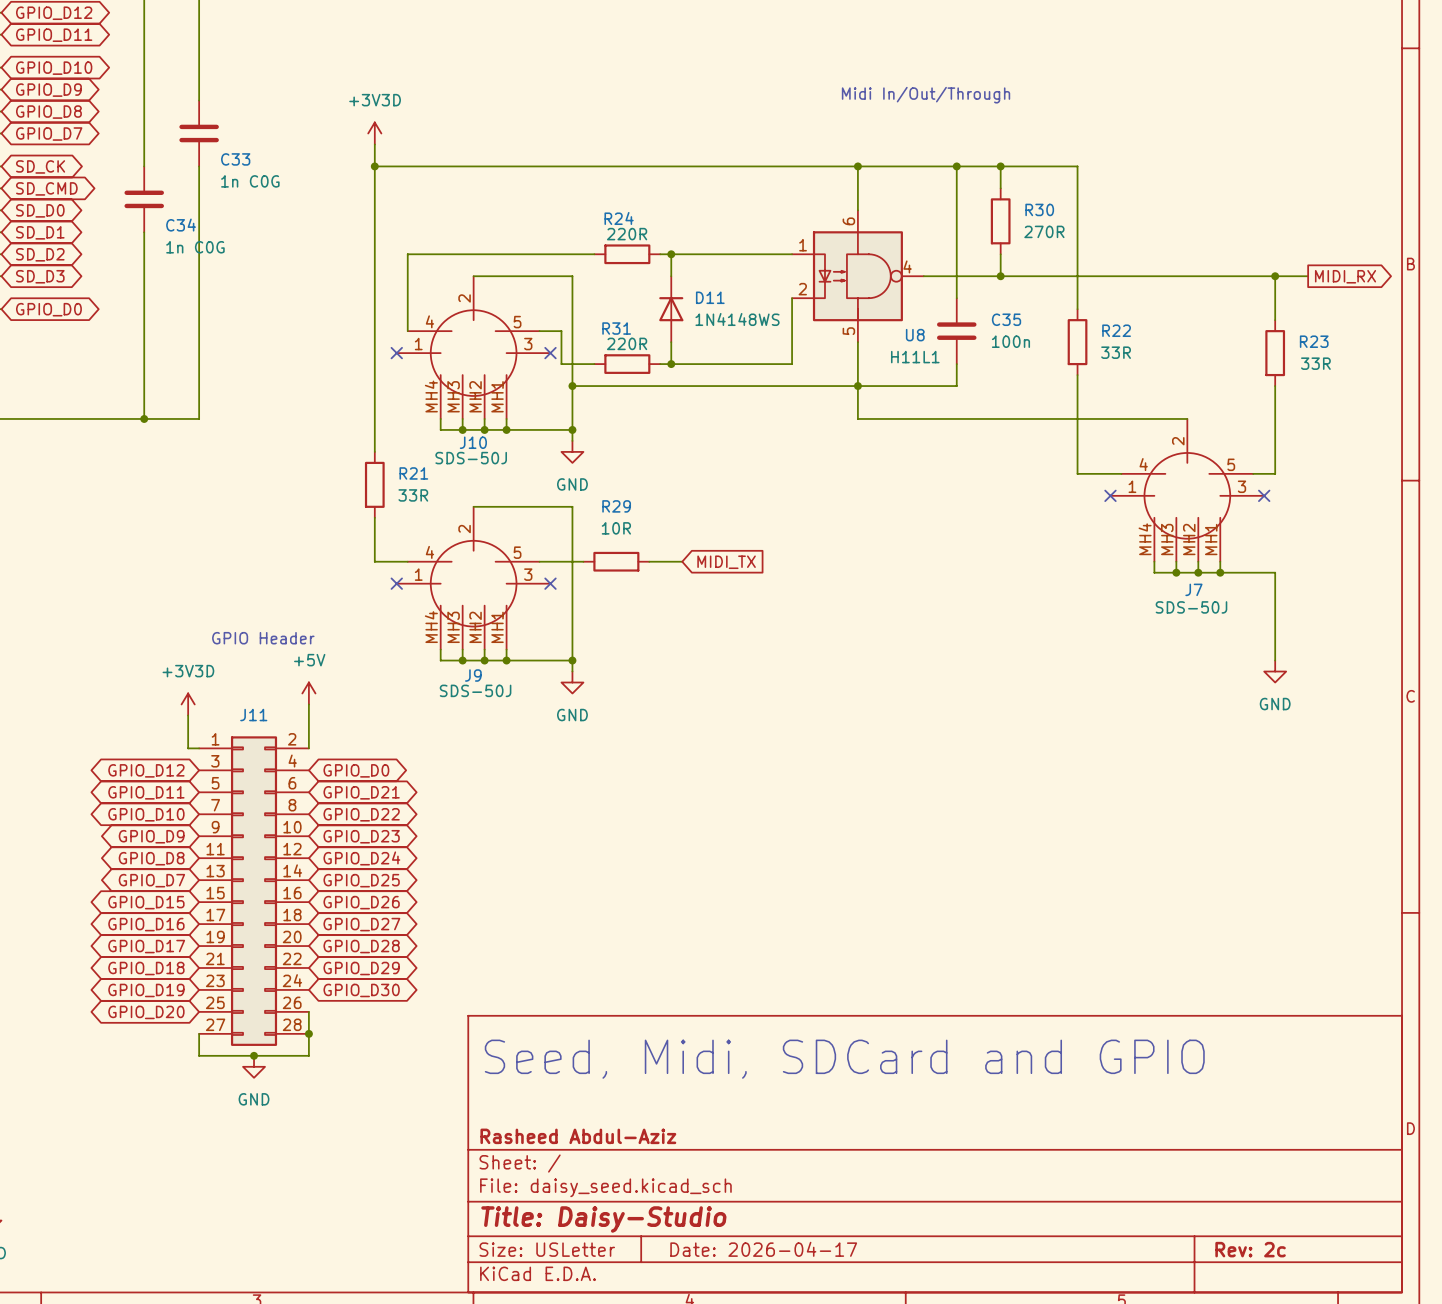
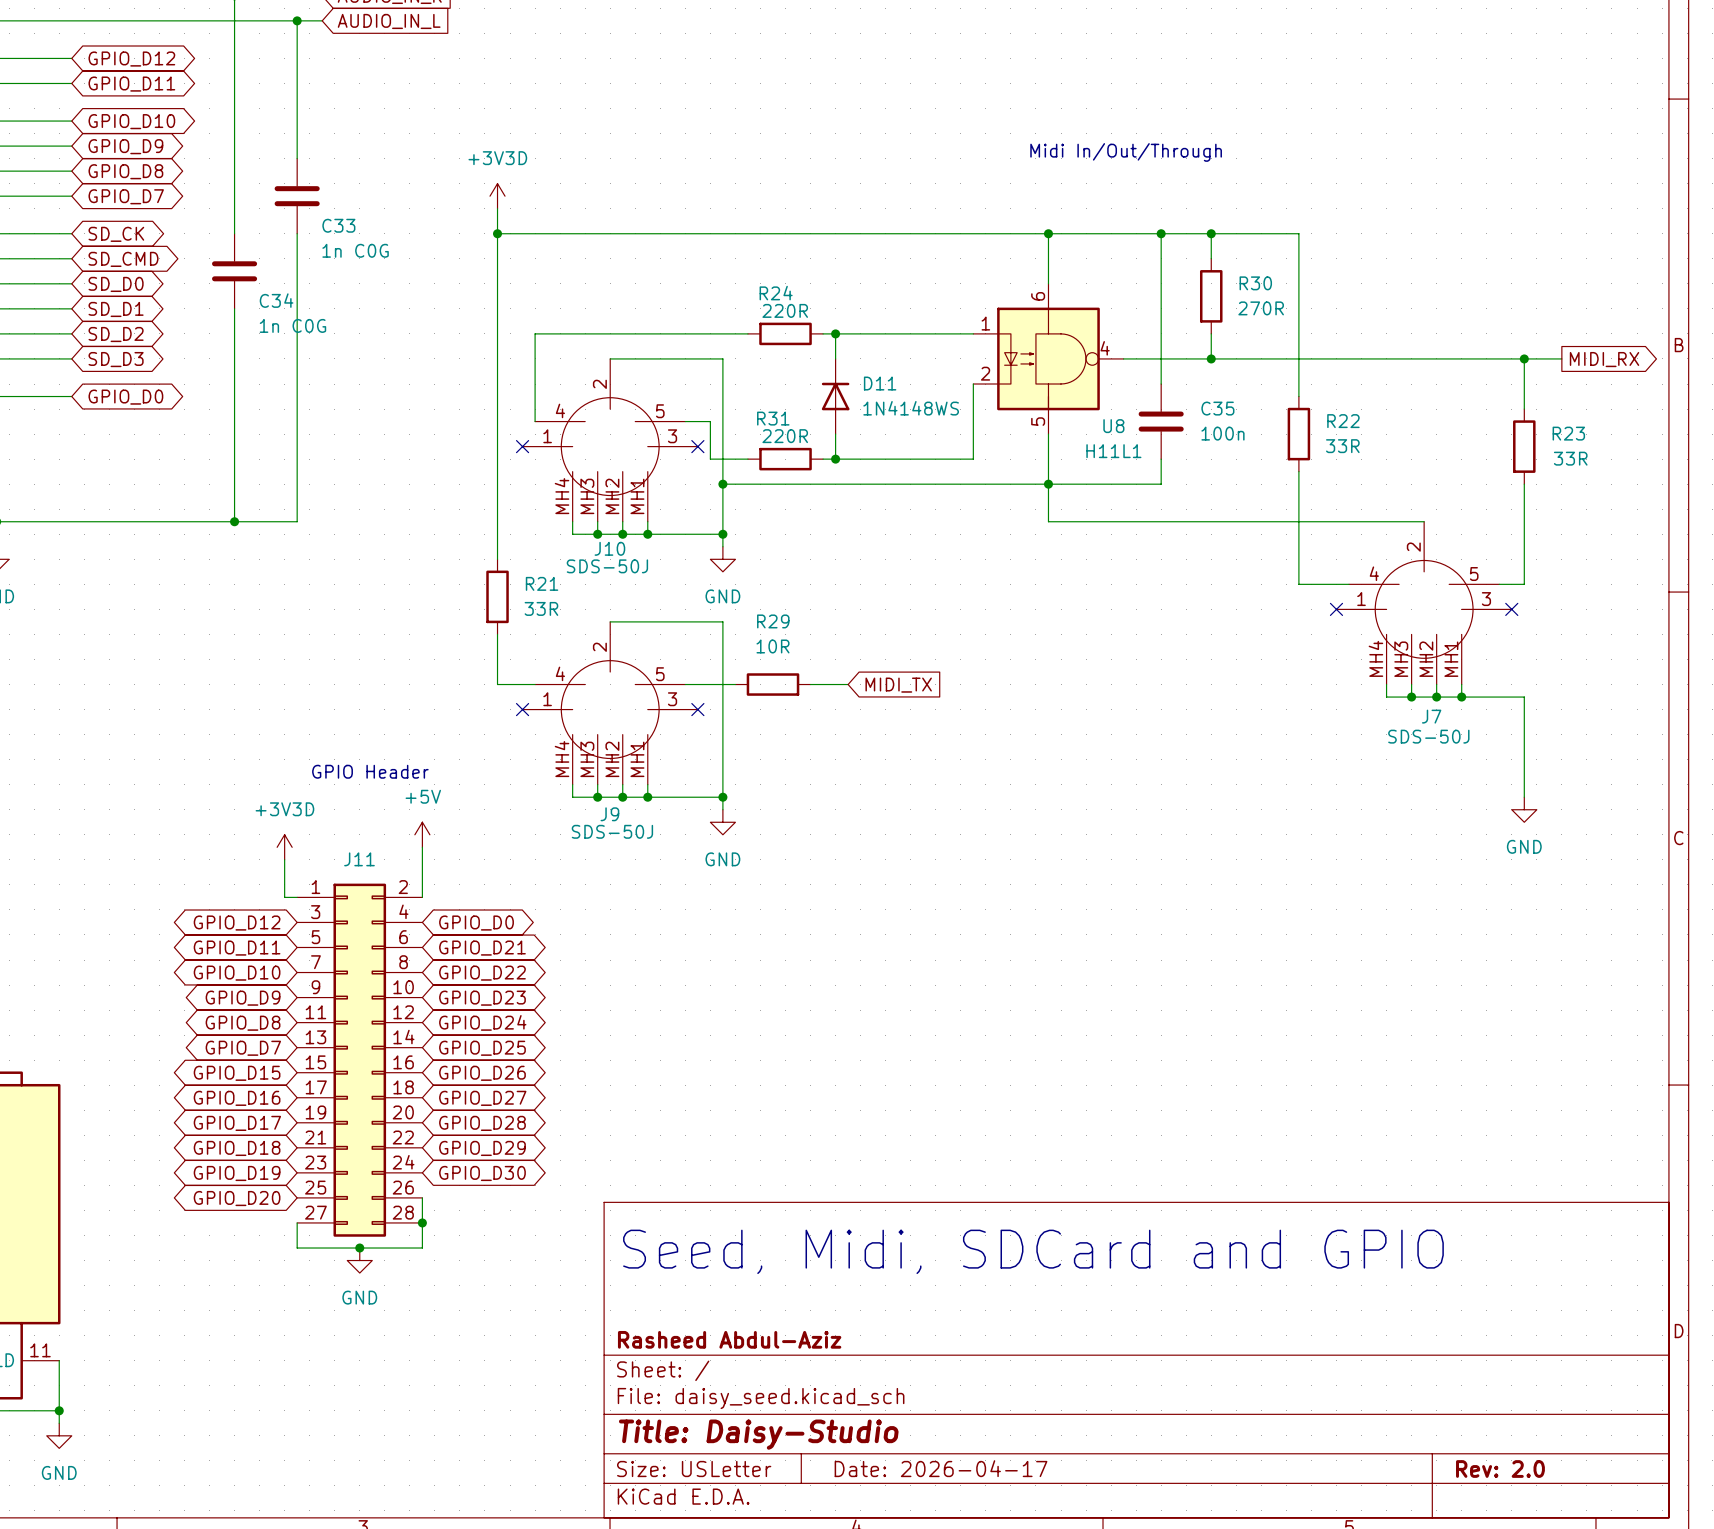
title block: Rev: 2c (1250, 1249) -> Rev: 2.0 (1500, 1469)

